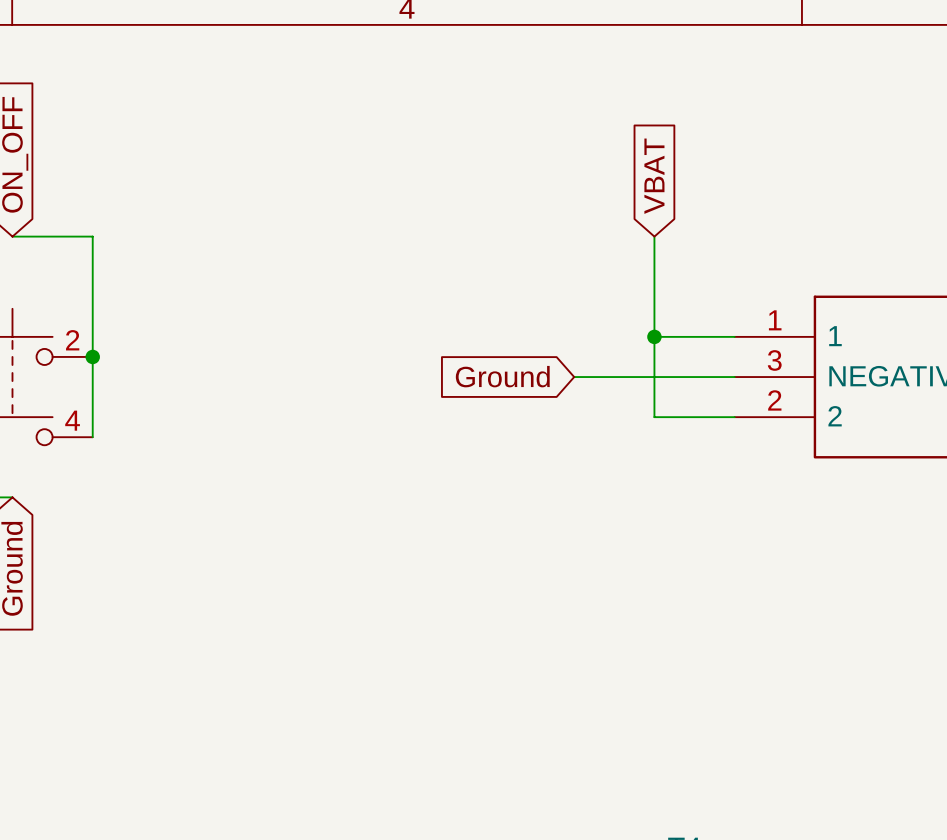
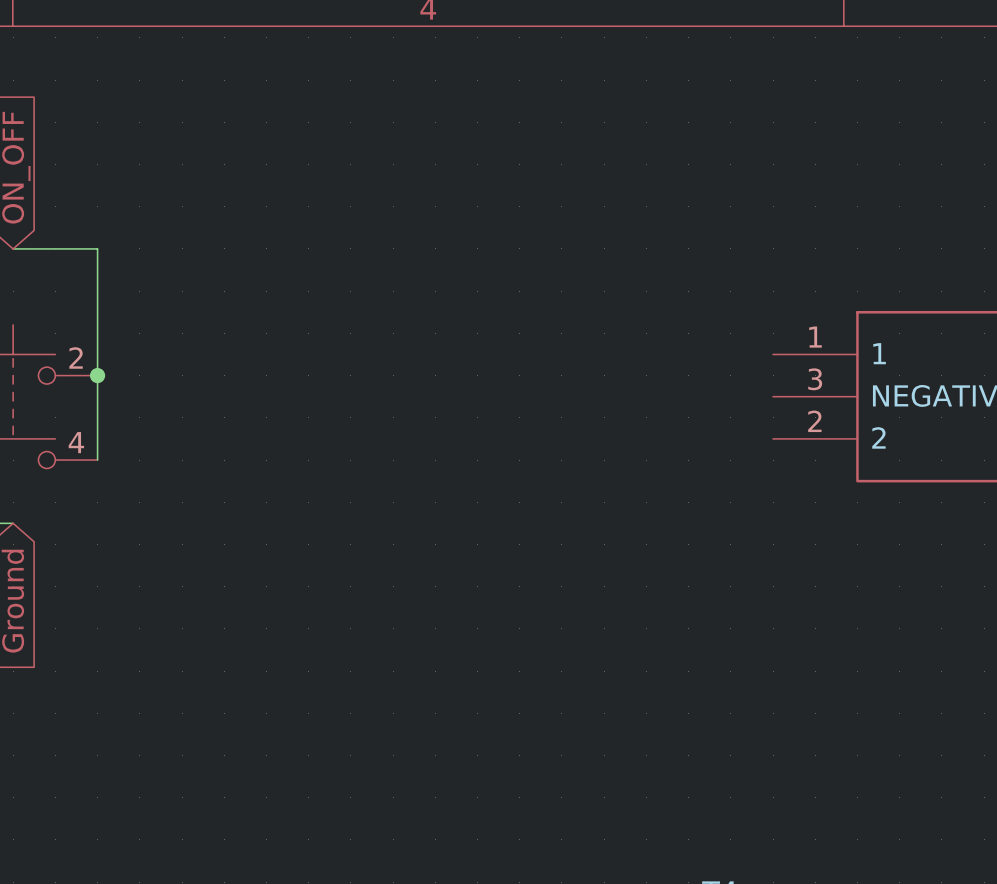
global label: VBAT (654, 176) -> none
wire: (654, 236) (654, 417) (734, 417) -> none
wire: (654, 336) (734, 336) -> none
junction: (654, 336) -> none
global label: Ground (502, 376) -> none
wire: (574, 377) (734, 377) -> none

